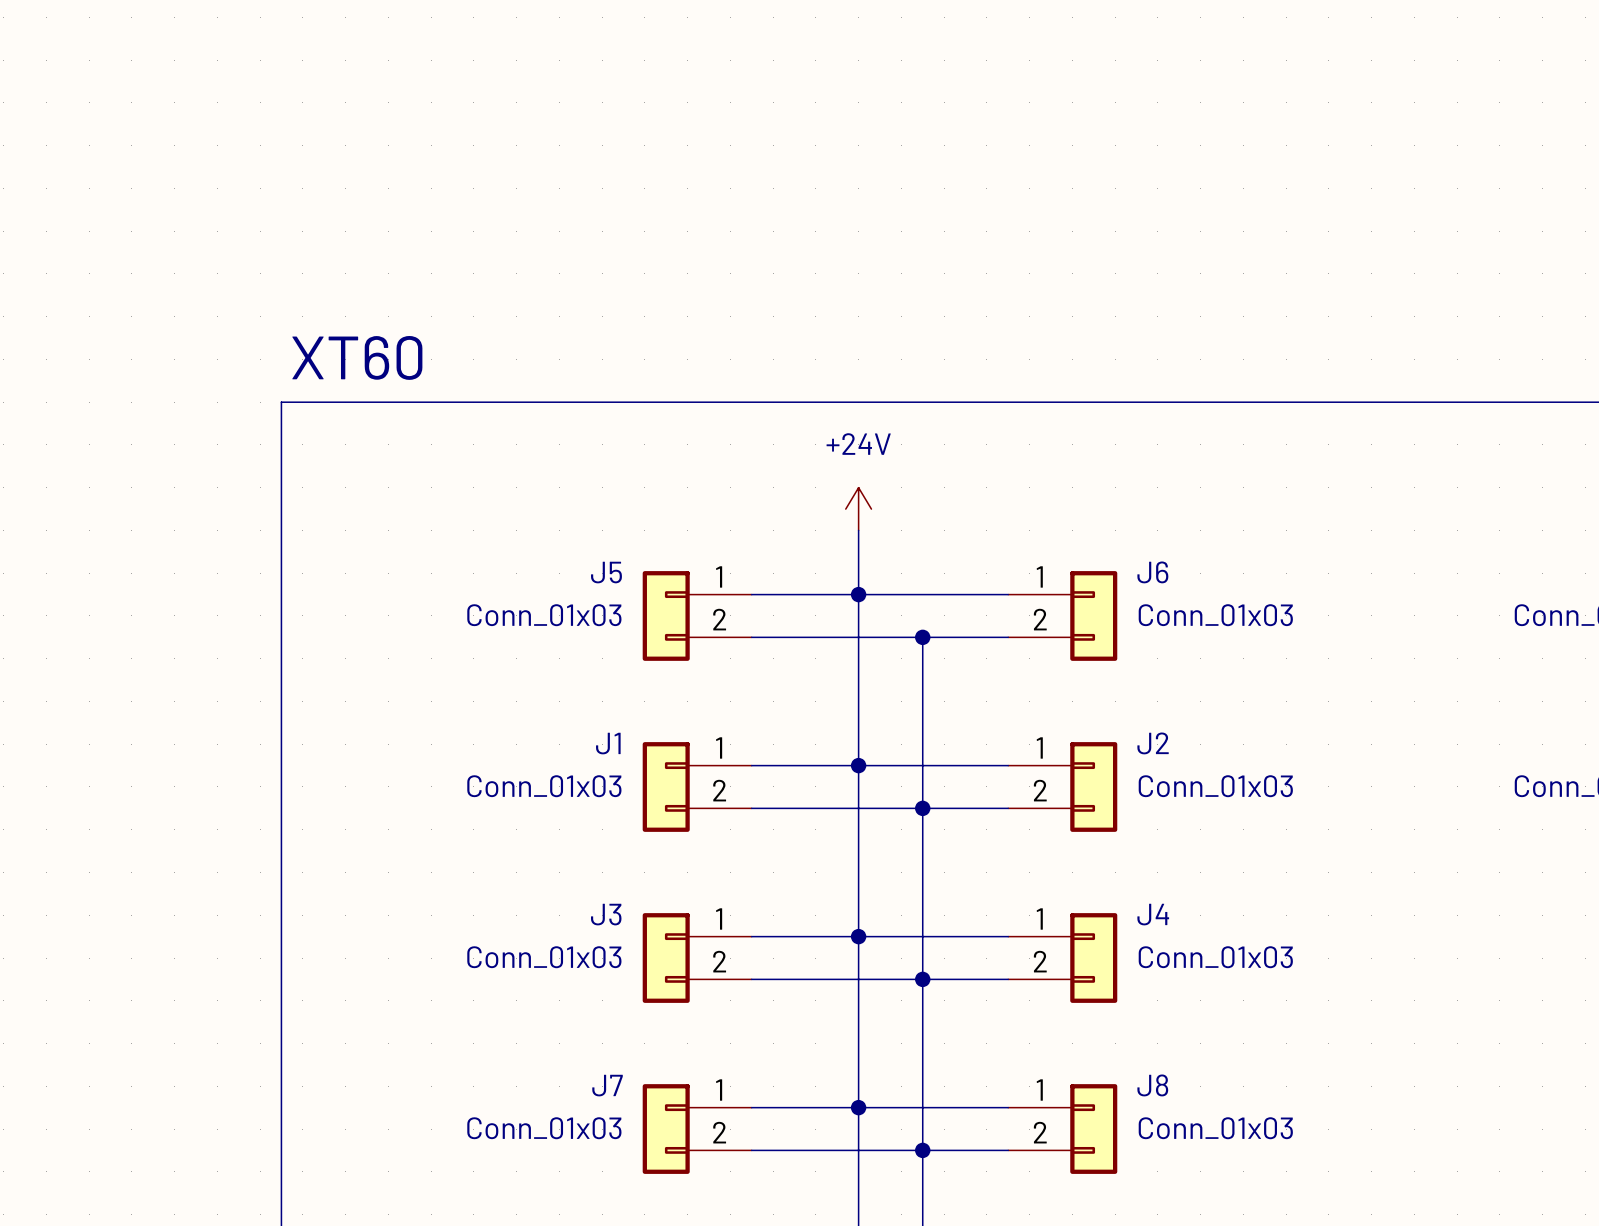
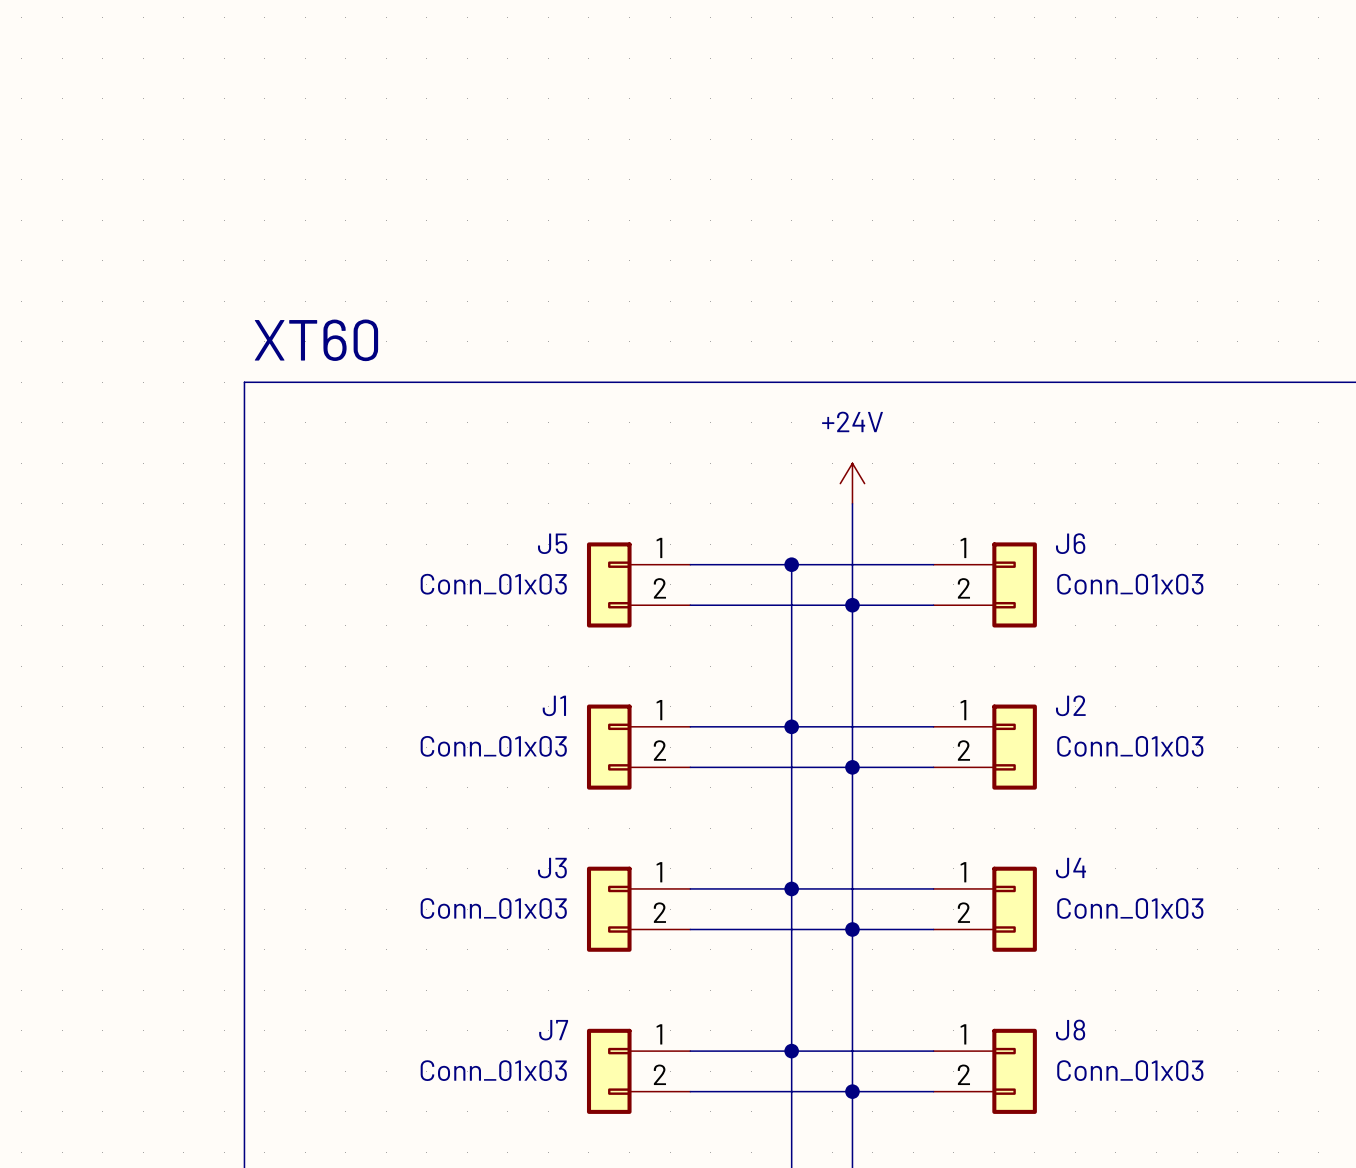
power symbol position: +24V (858, 509) -> +24V (852, 483)
wire: (858, 530) (858, 594) -> none
wire: none -> (852, 503) (852, 605)

